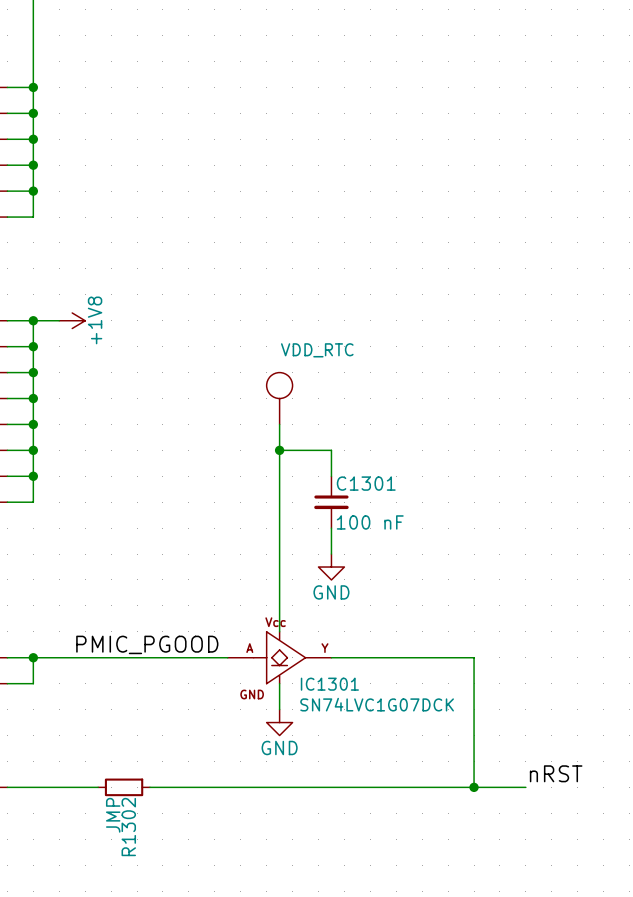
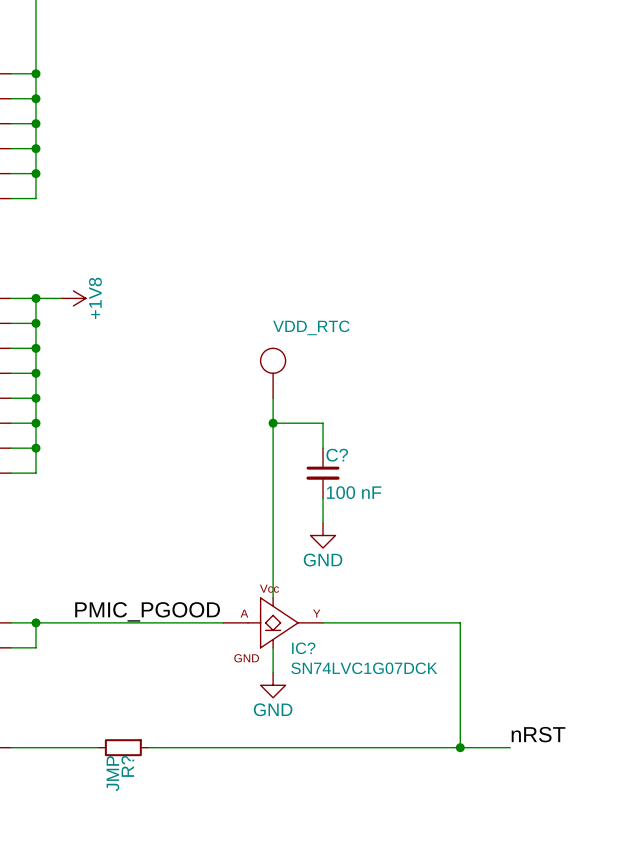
C1301 name: C1301 (366, 483) -> C? (337, 455)
IC1301 name: IC1301 (329, 684) -> IC? (303, 648)
R1302 name: R1302 (128, 827) -> R? (127, 766)

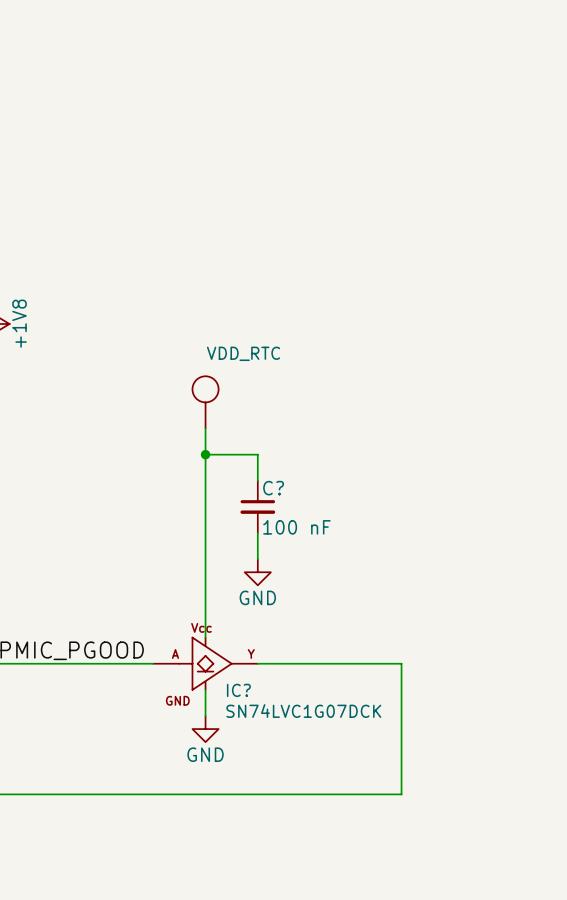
label: nRST (538, 734) -> none
wire: none -> (22, 794) (74, 794)
R?: JMP (123, 747) -> none
wire: (460, 747) (510, 747) -> none
junction: (460, 747) -> none

